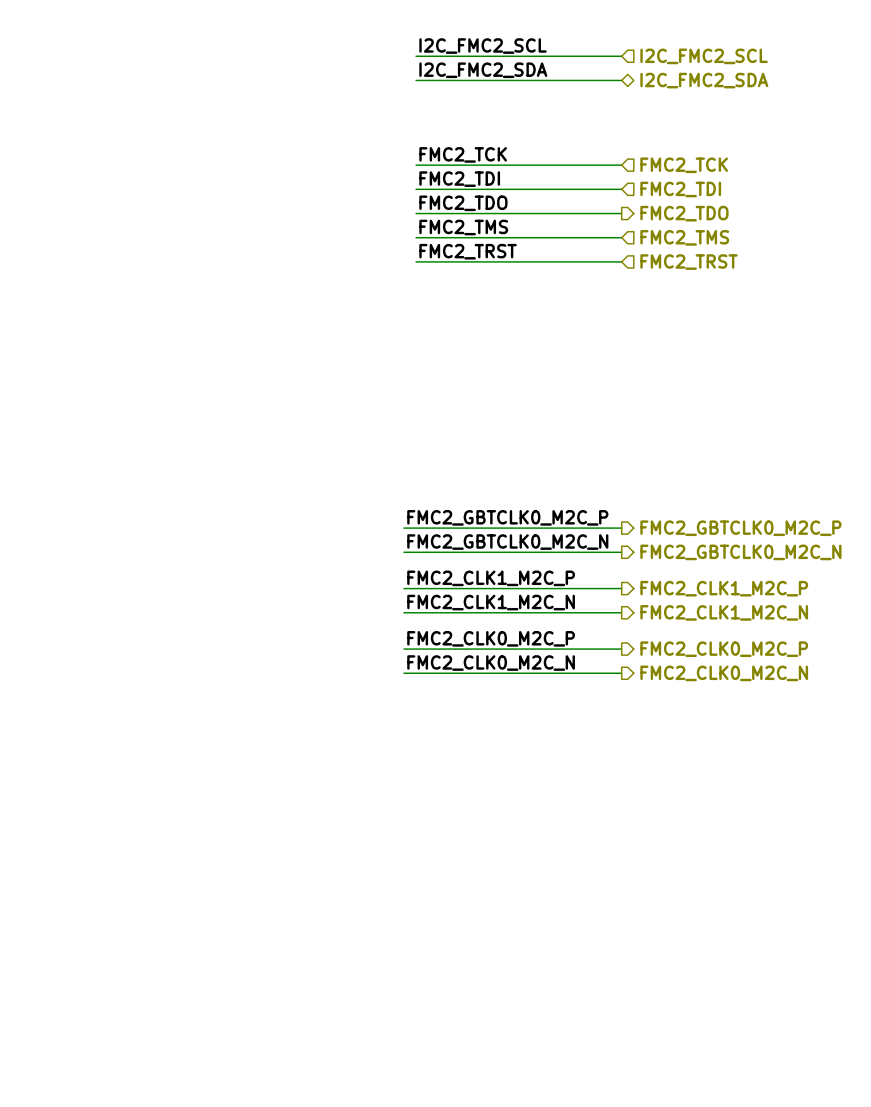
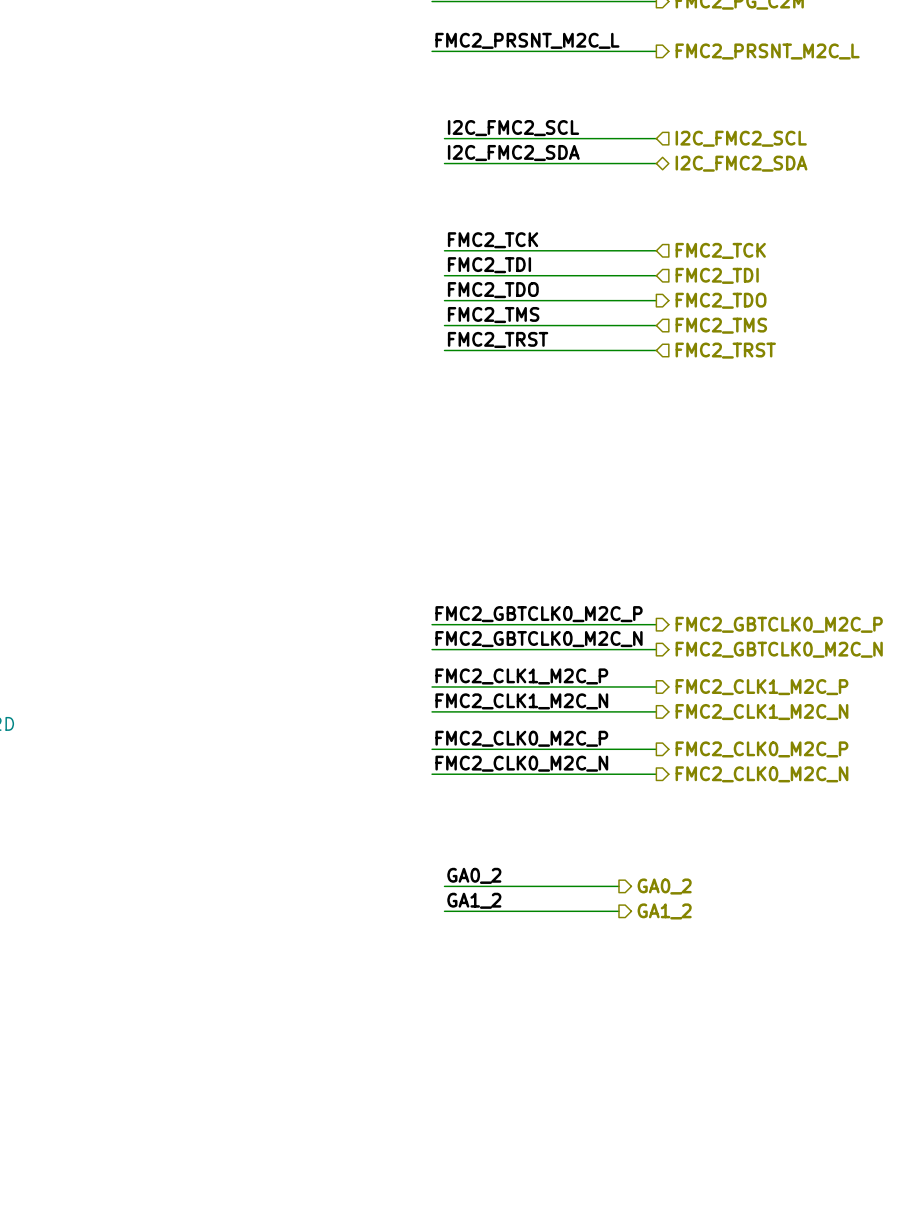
label: none -> GA0_2 (474, 875)
wire: none -> (444, 886) (618, 886)
hierarchical label: none -> GA0_2 (664, 886)
label: none -> GA1_2 (474, 900)
wire: none -> (444, 911) (618, 911)
hierarchical label: none -> GA1_2 (664, 911)

